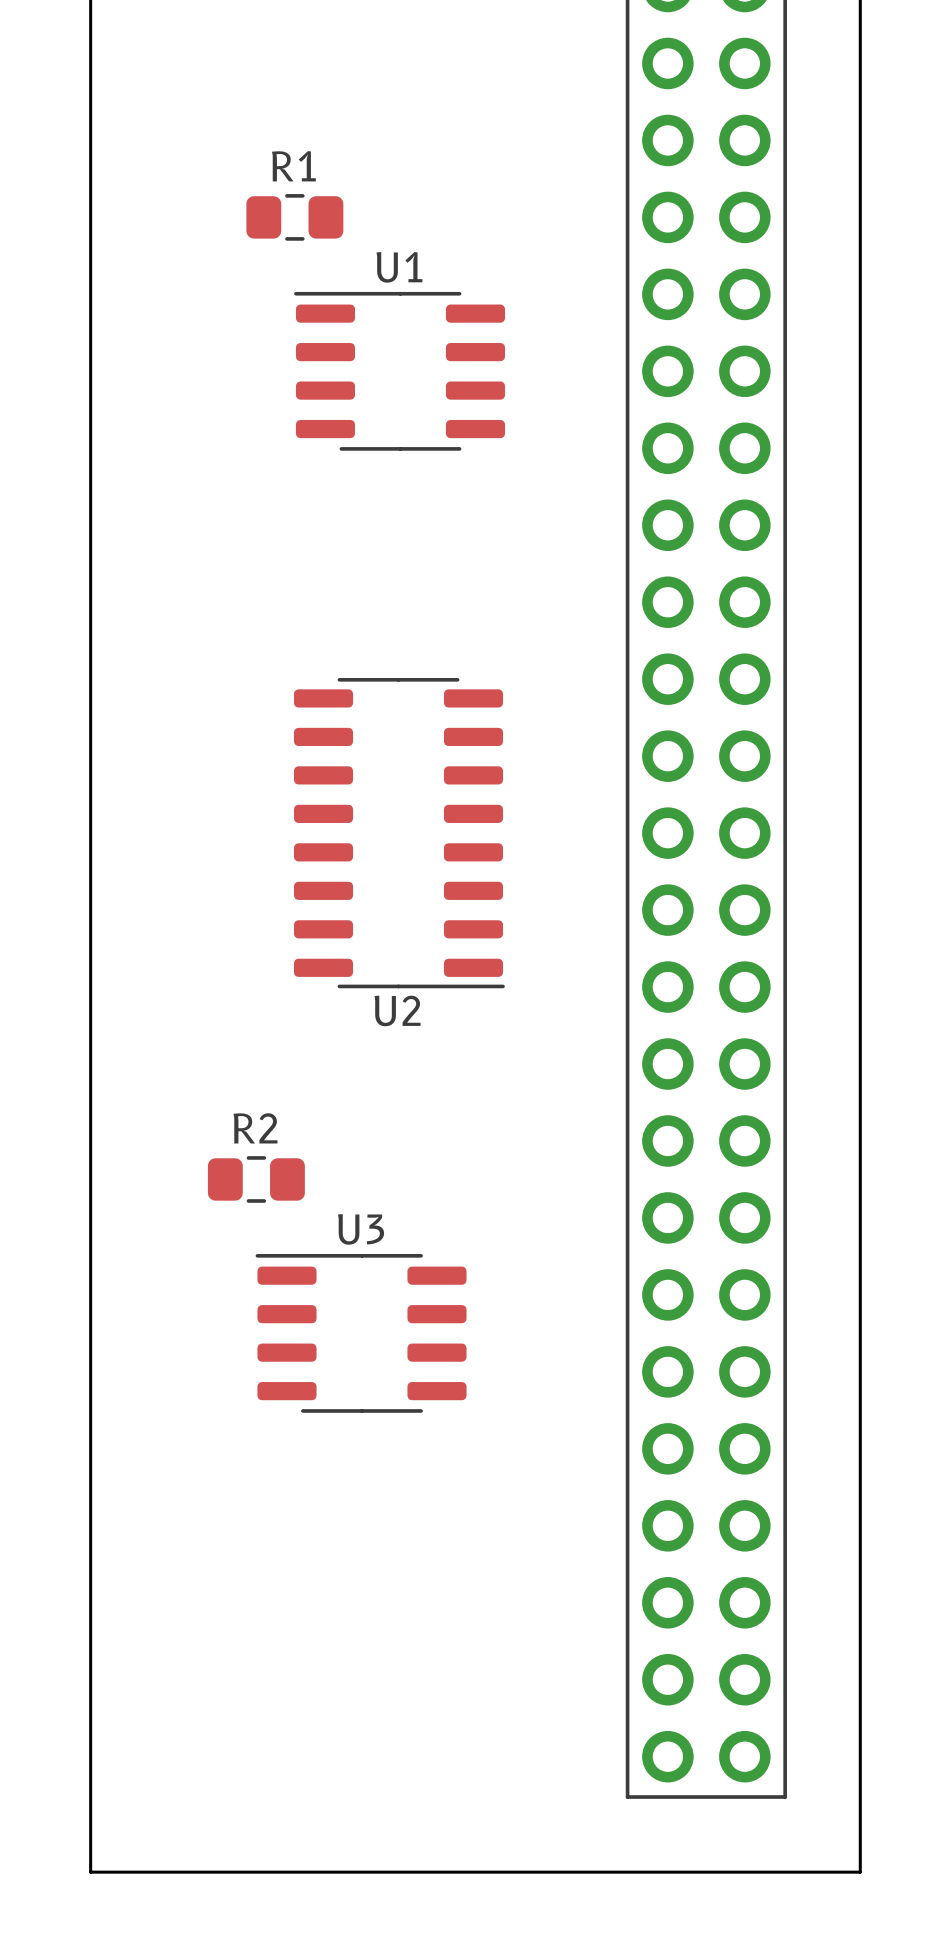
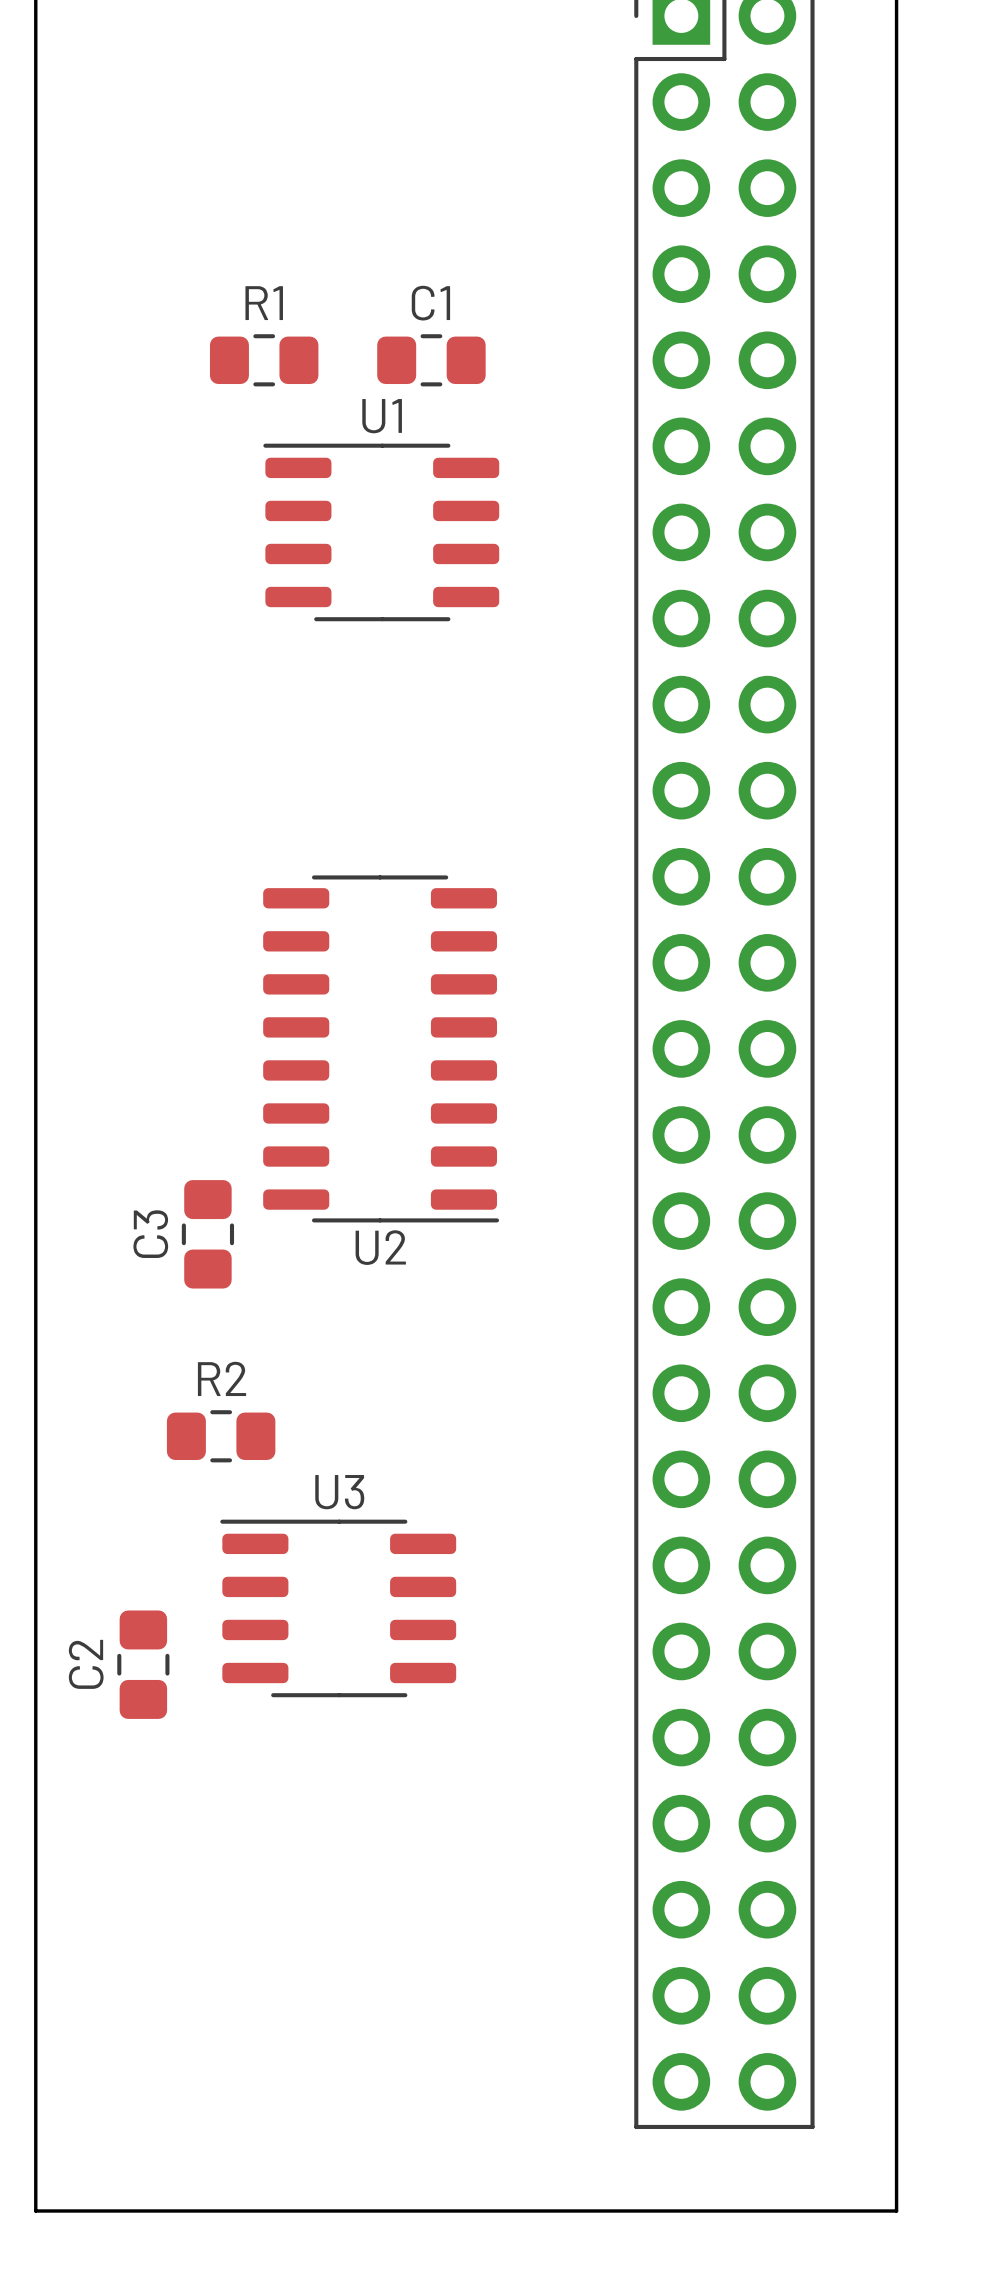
C1: none -> (431, 360)
C3: none -> (207, 1234)
C2: none -> (143, 1664)

